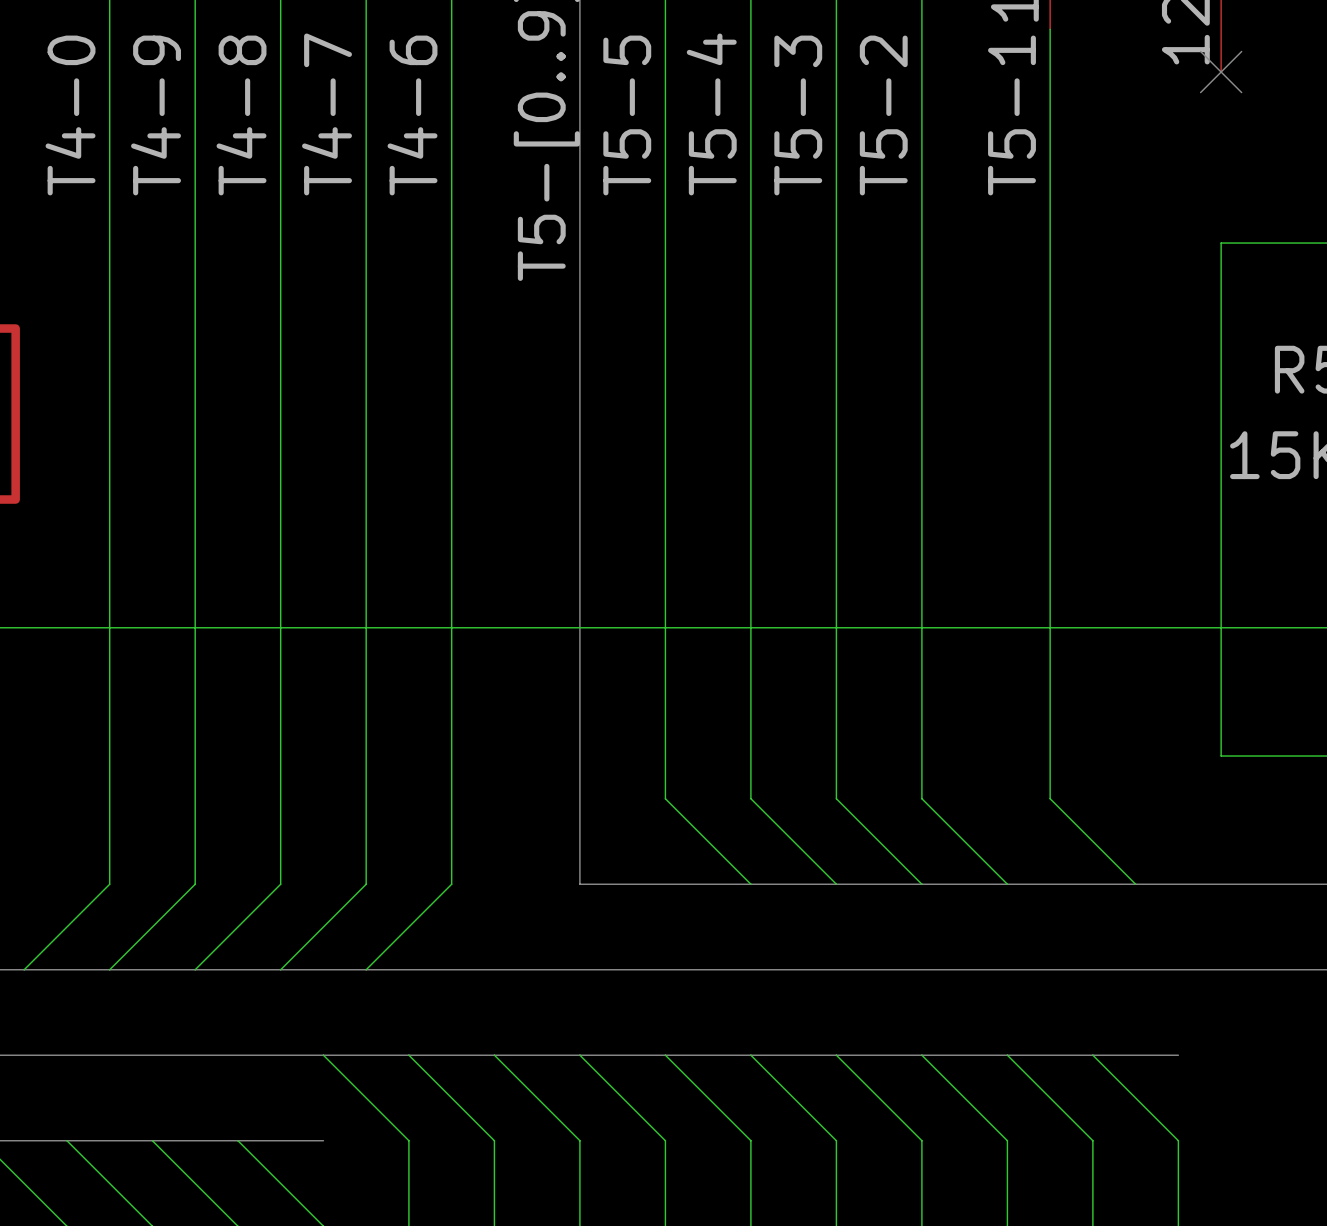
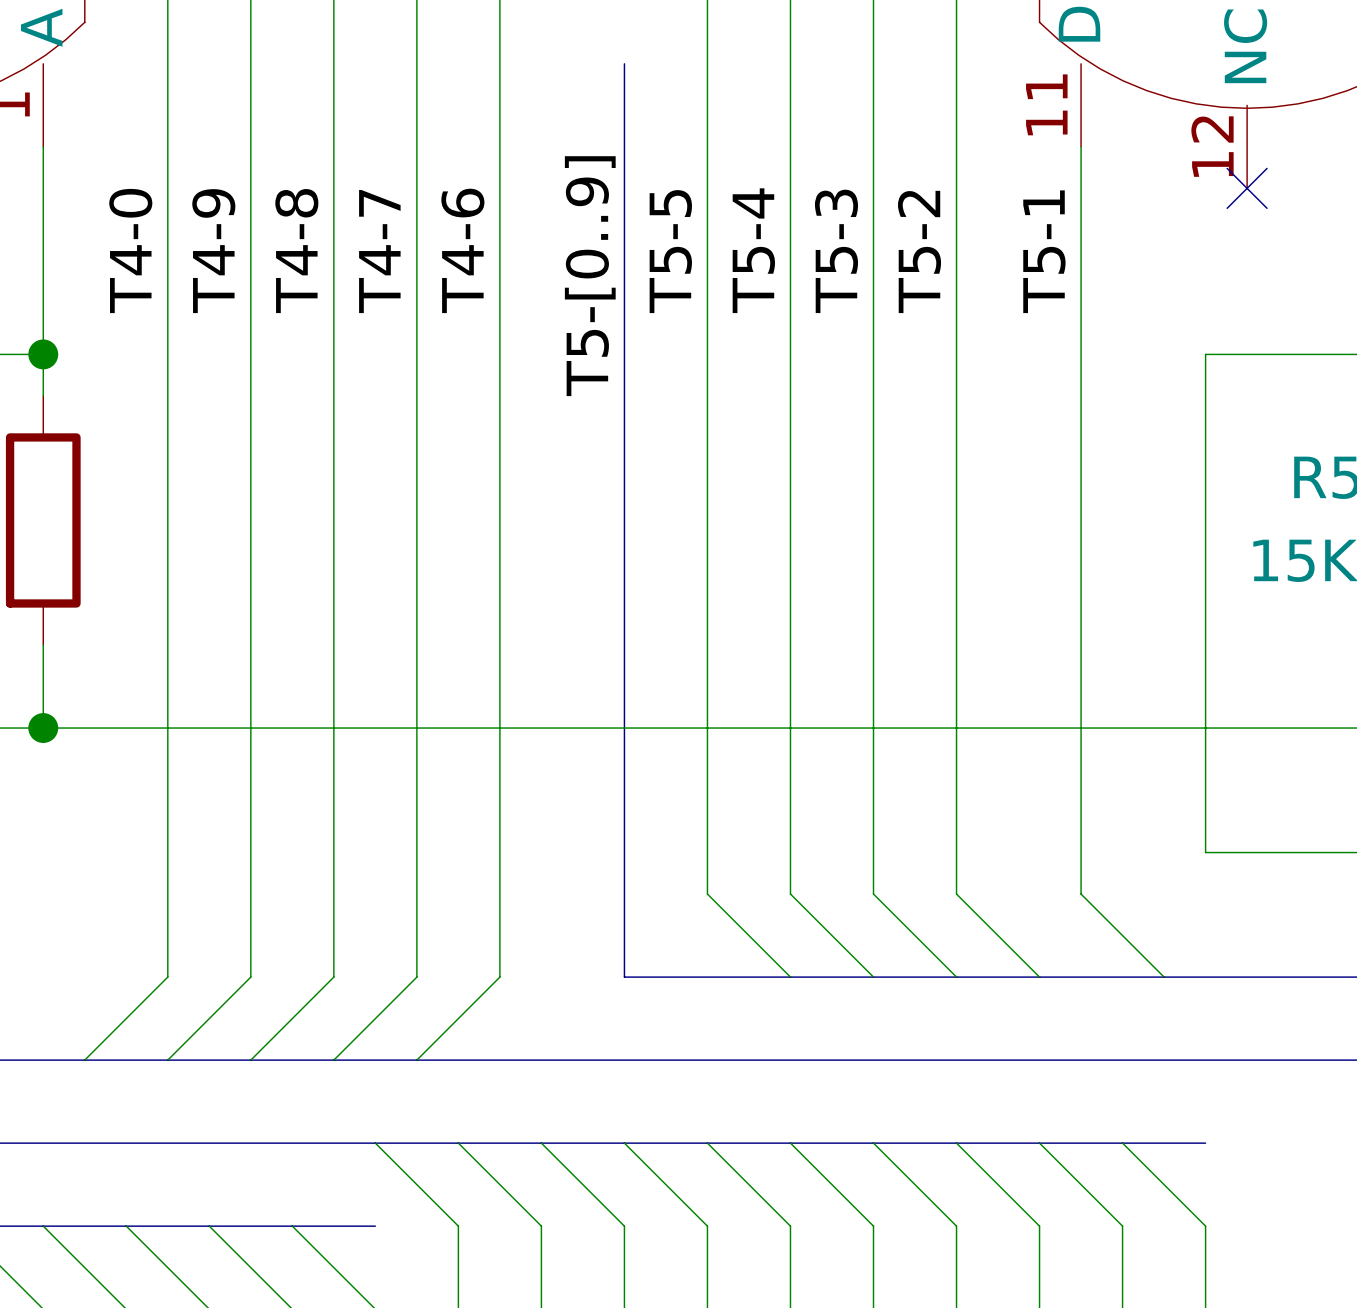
wire: (1221, 243) (1221, 756) -> (1247, 354) (1205, 354) (1205, 852) (1247, 852)

